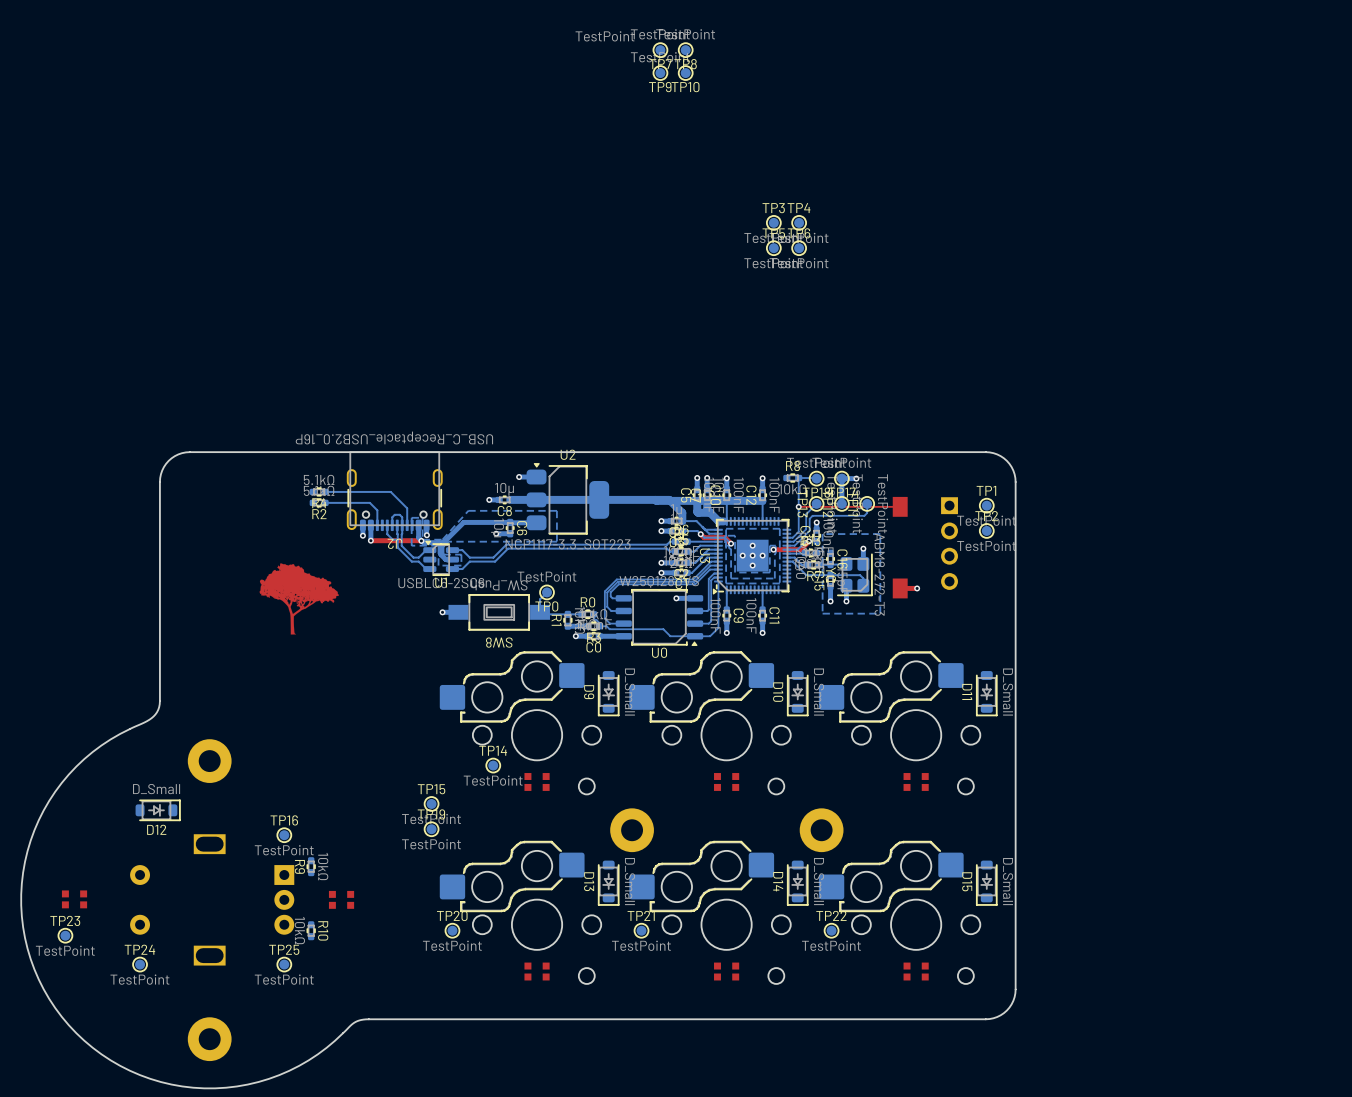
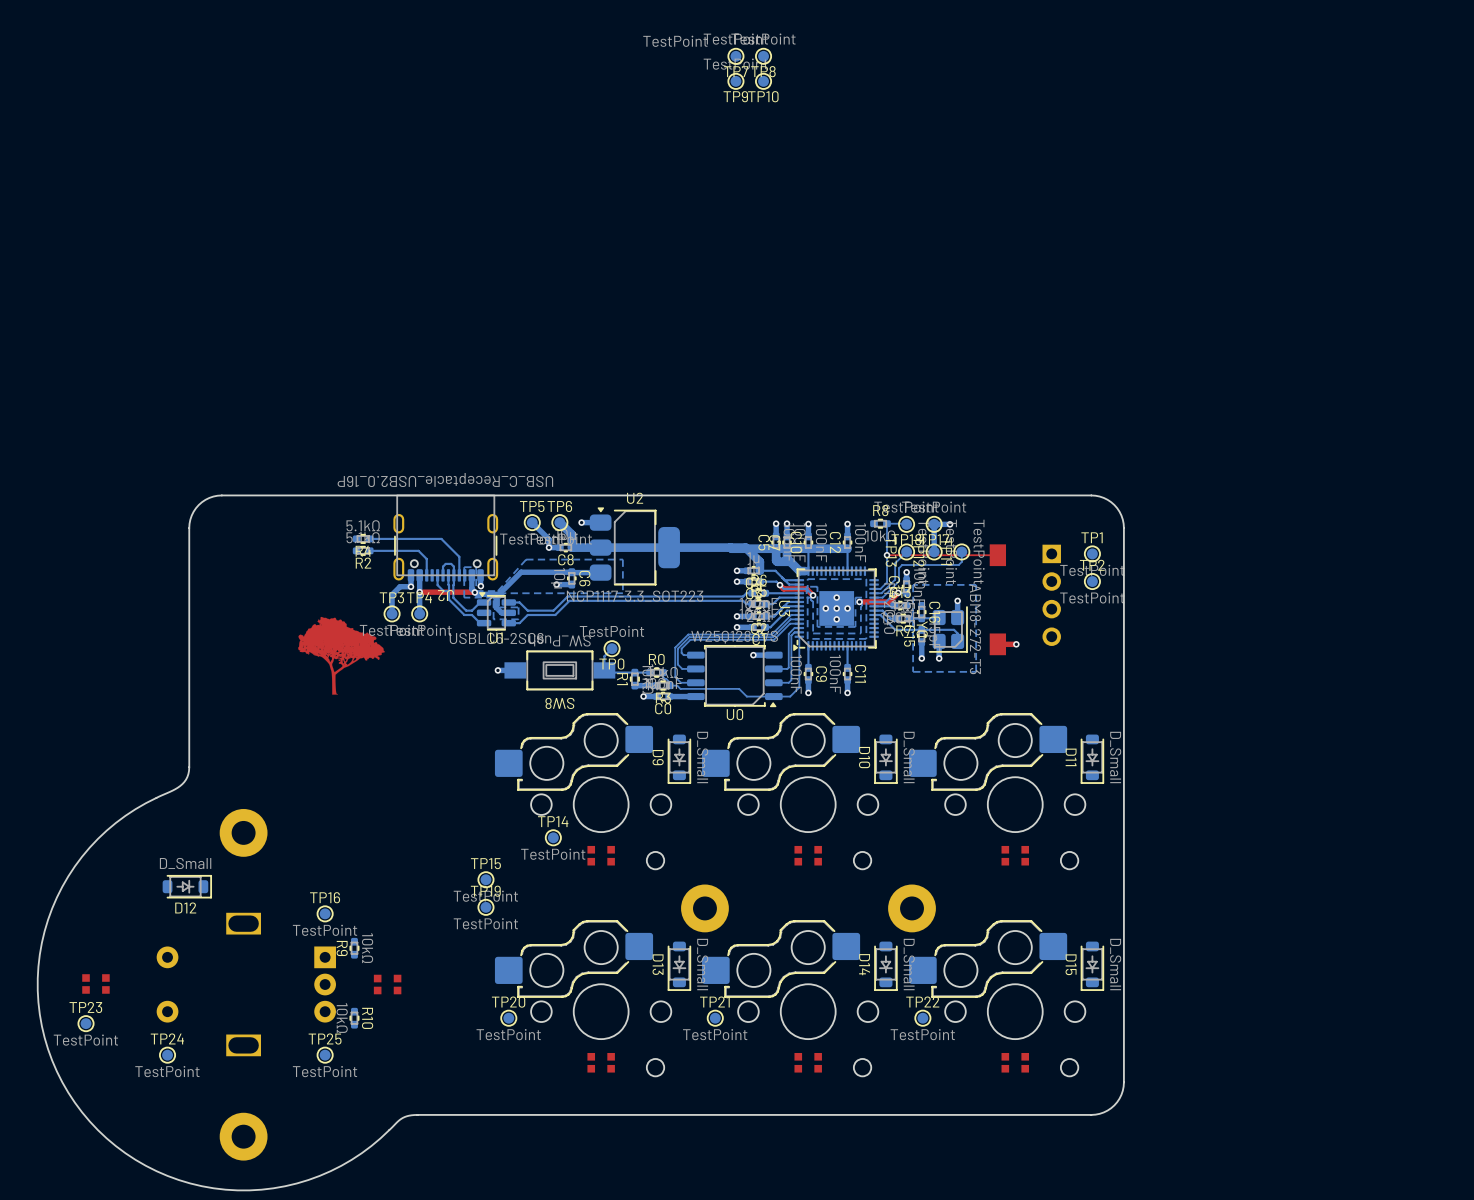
TP3 position: (773, 222) -> (392, 613)
TP4 position: (799, 222) -> (419, 613)
TP5 position: (773, 248) -> (532, 522)
TP6 position: (799, 248) -> (559, 522)
bottom track: none -> (532, 522) (549, 539) (549, 547)
bottom track: none -> (559, 522) (572, 534) (572, 547)
bottom track: none -> (410, 586) (400, 586) (392, 594) (392, 613)
bottom track: none -> (419, 592) (419, 613)

